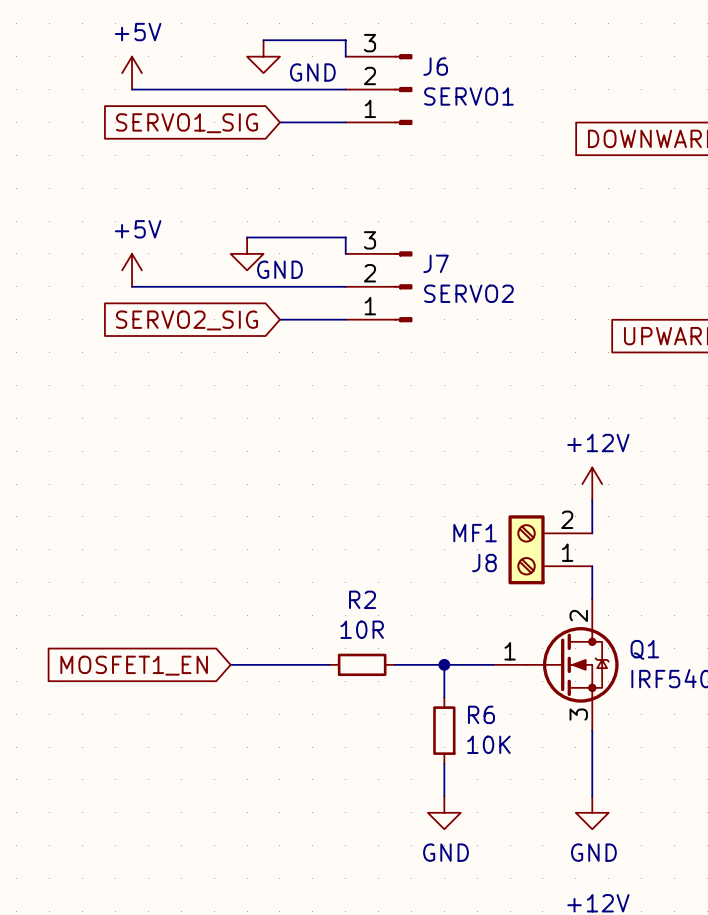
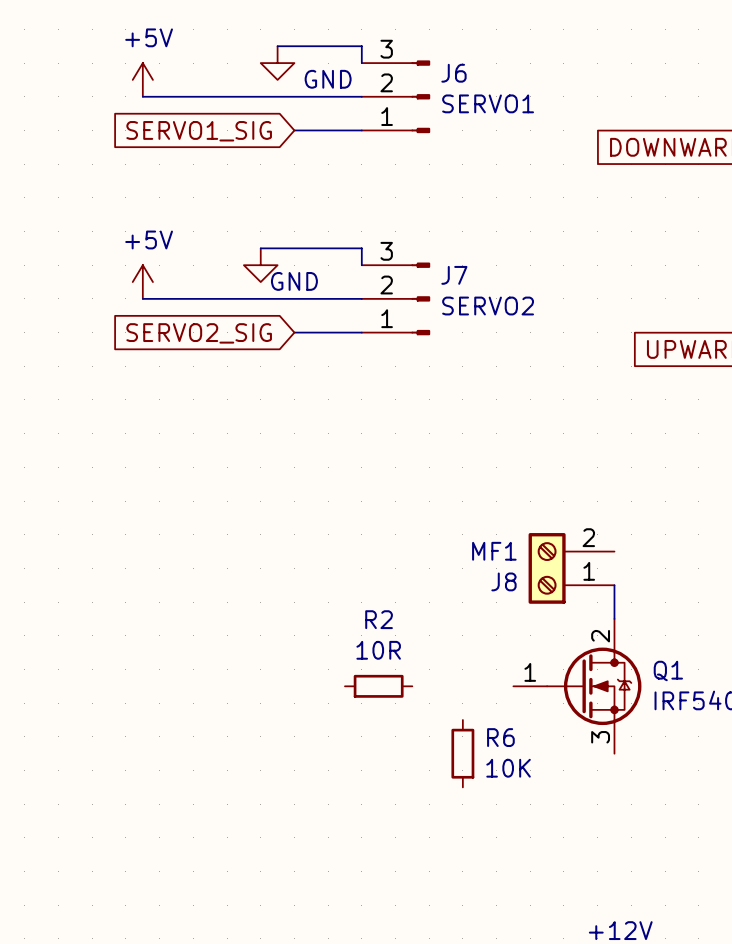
power symbol: +12V (592, 484) -> none
wire: (592, 500) (592, 533) -> none
wire: (230, 664) (329, 664) -> none
wire: (395, 664) (493, 664) -> none
wire: (444, 664) (444, 697) -> none
junction: (444, 664) -> none
global label: MOSFET1_EN (134, 665) -> none
wire: (592, 730) (592, 796) -> none
wire: (444, 763) (444, 796) -> none
power symbol: GND (444, 812) -> none
power symbol: GND (592, 812) -> none

